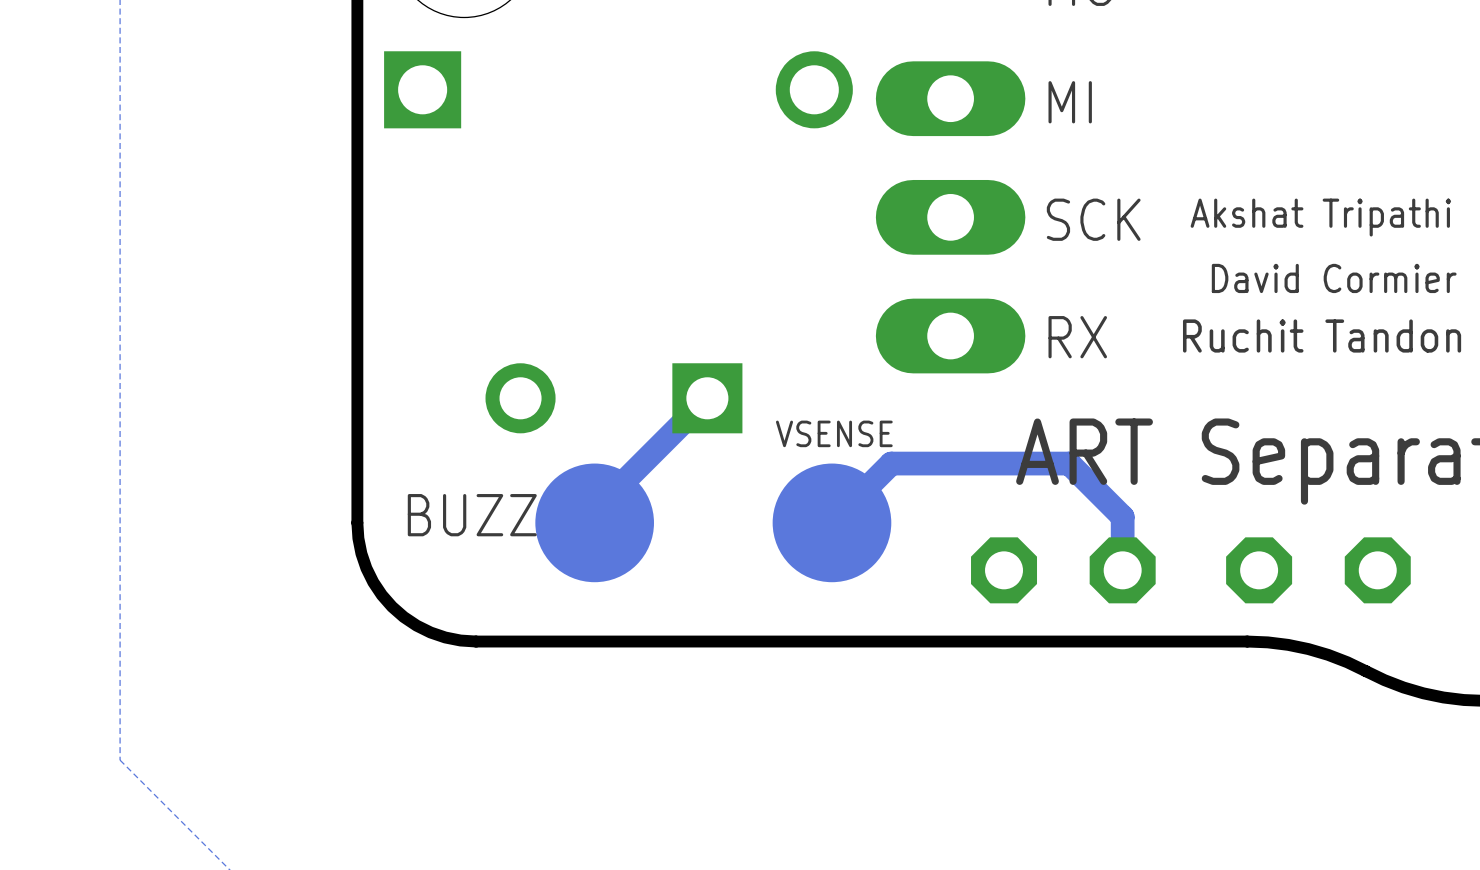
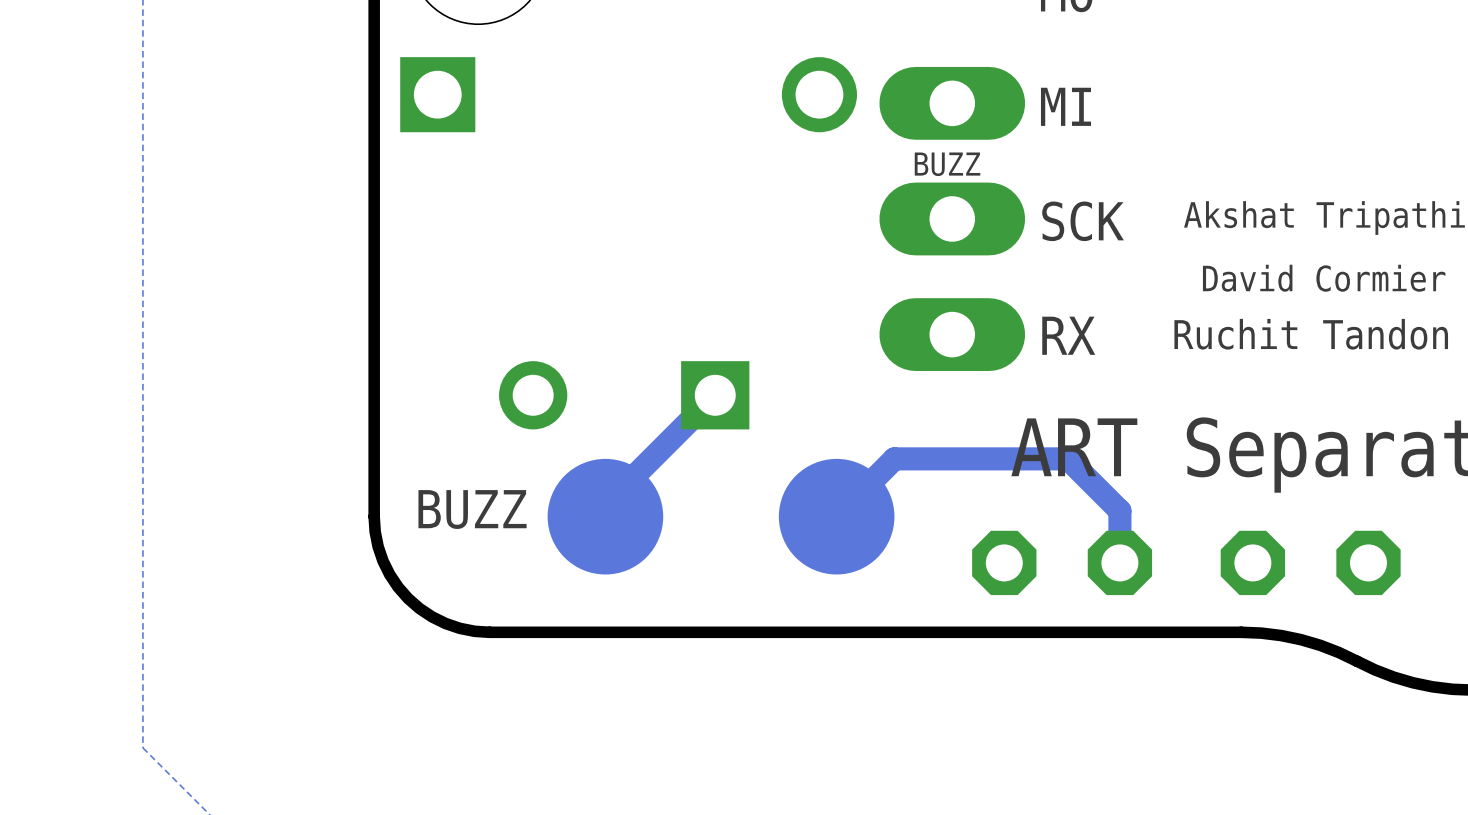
text: none -> BUZZ (947, 164)
text: VSENSE (834, 433) -> none

